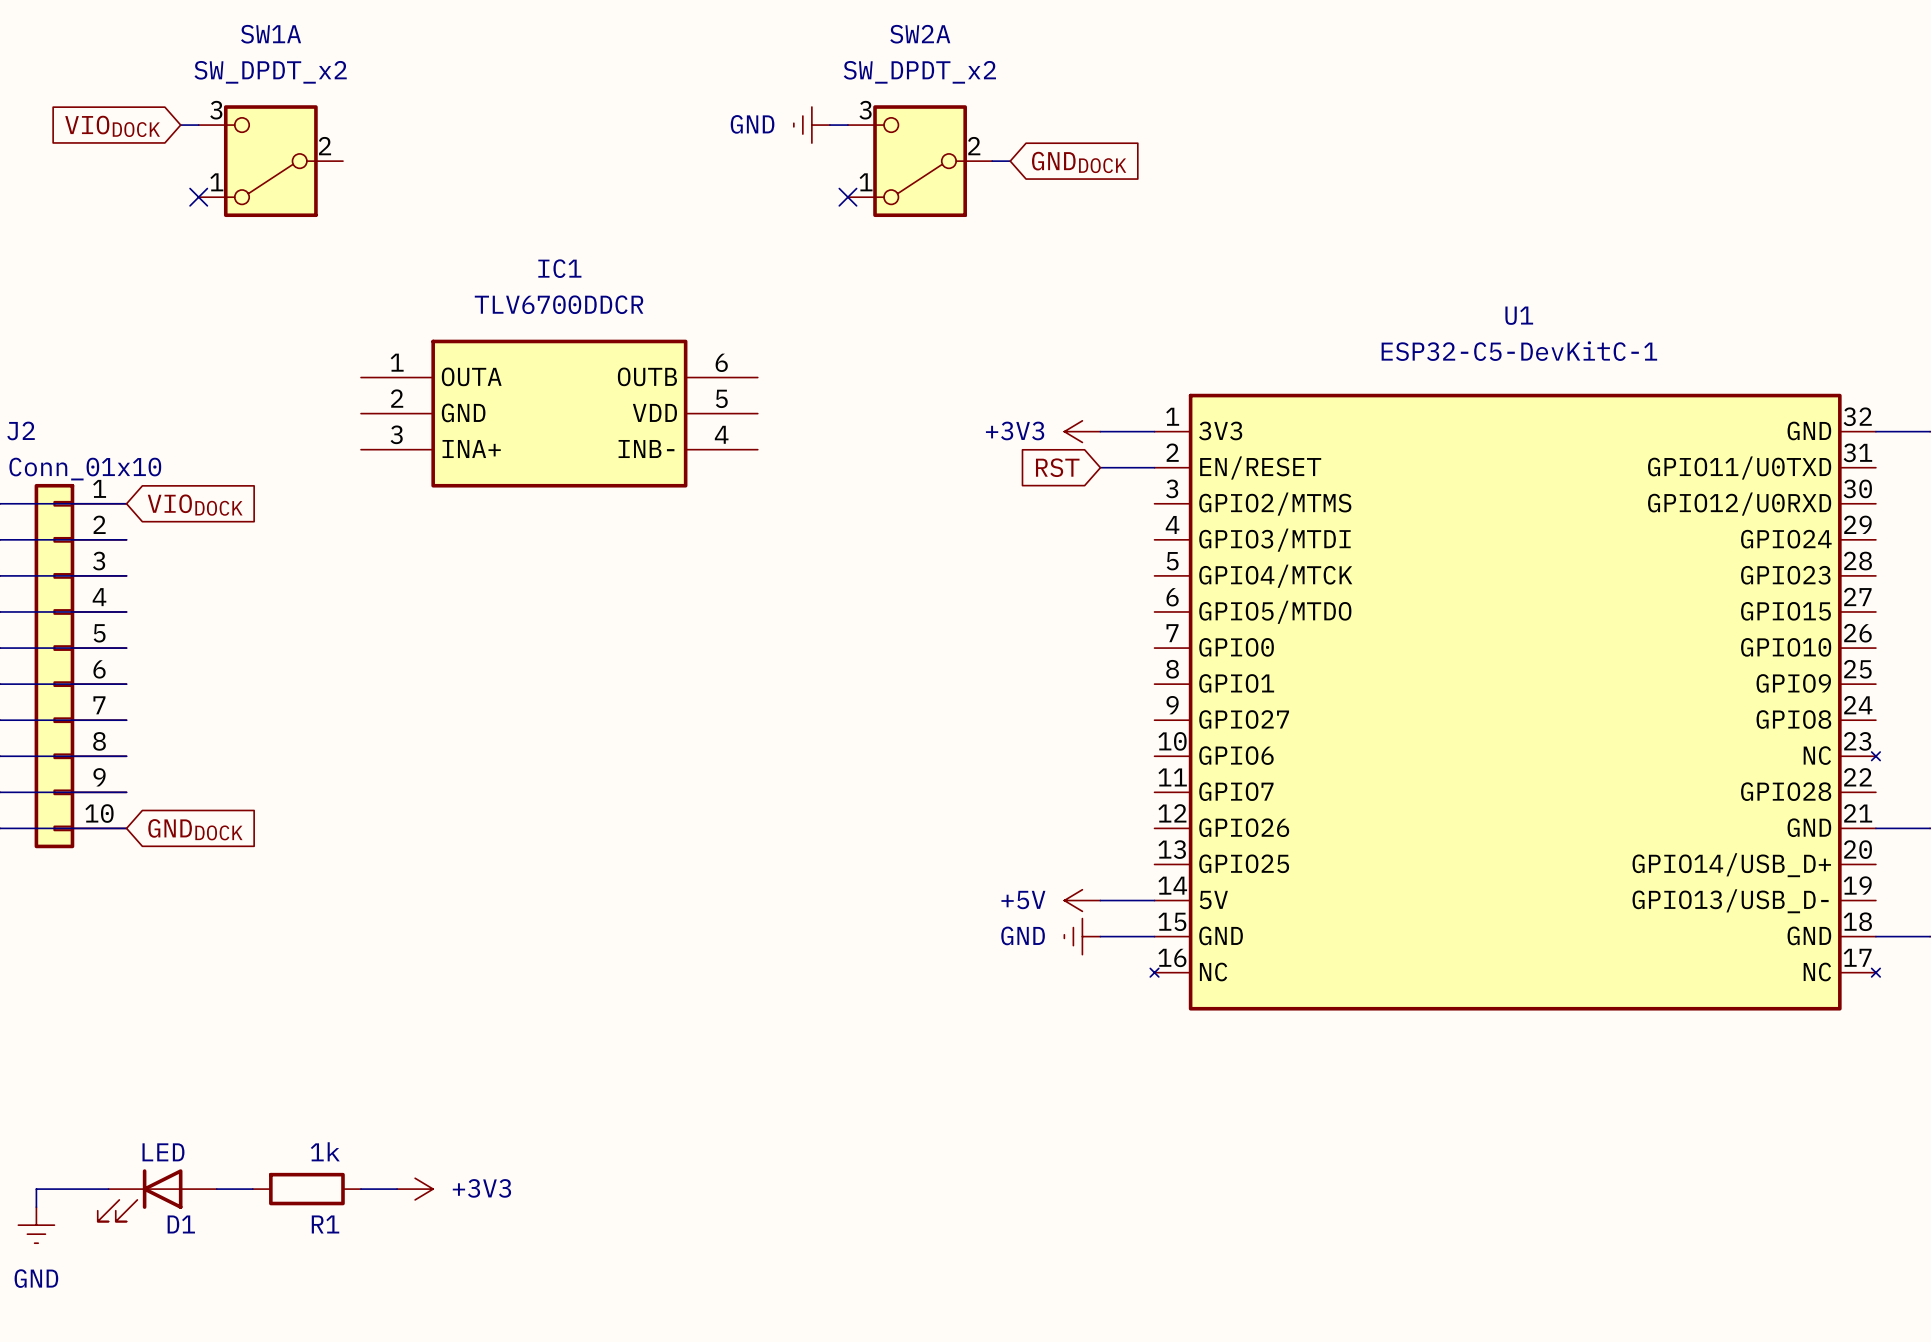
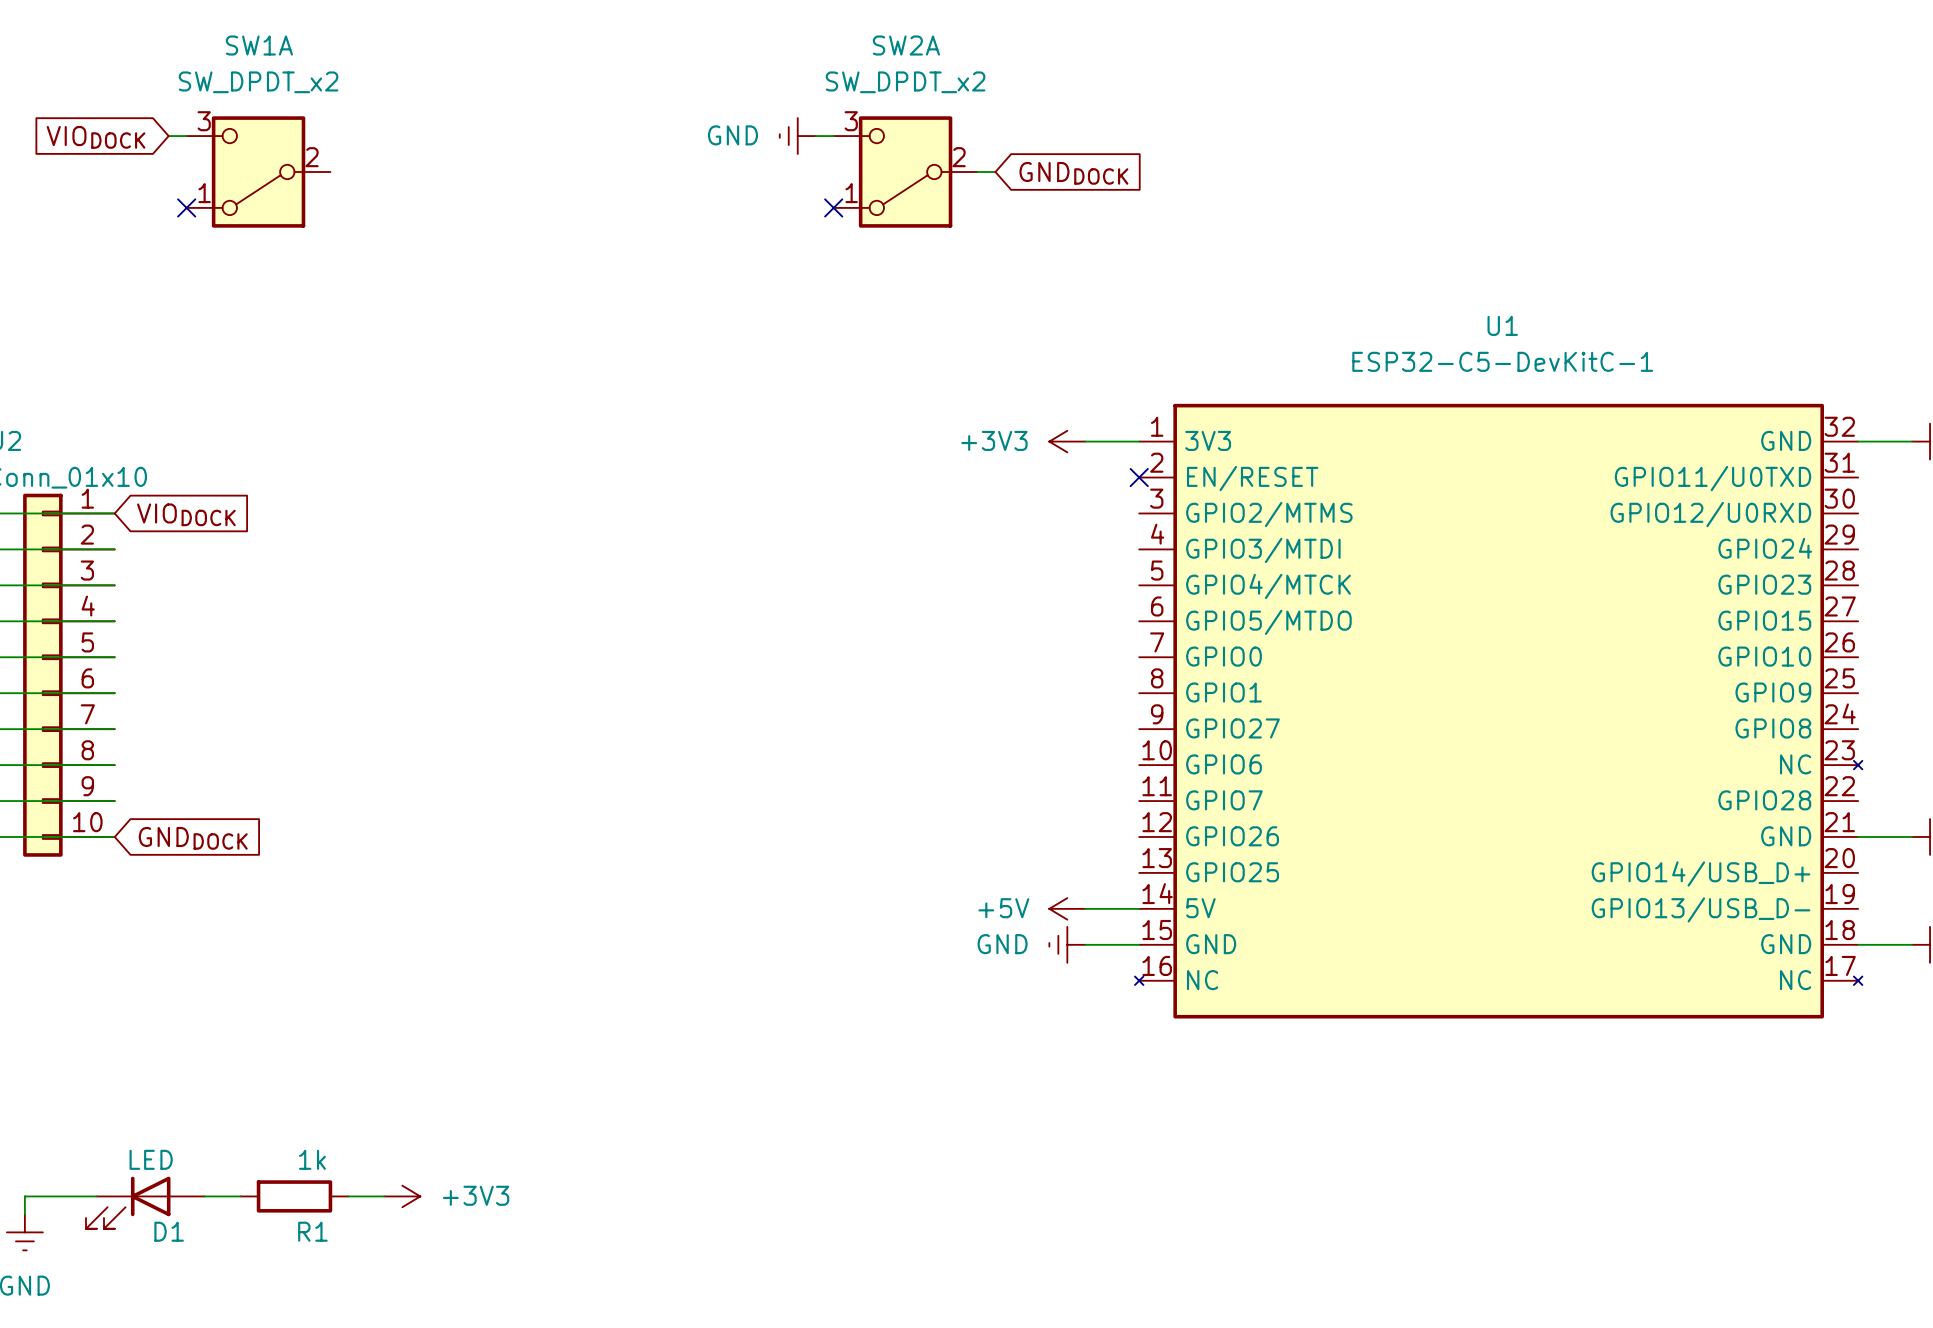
IC1: TLV6700DDCR (559, 413) -> none
global label: RST (1057, 467) -> none
wire: (1100, 467) (1154, 467) -> none
no-connect mark: none -> (1139, 477)

